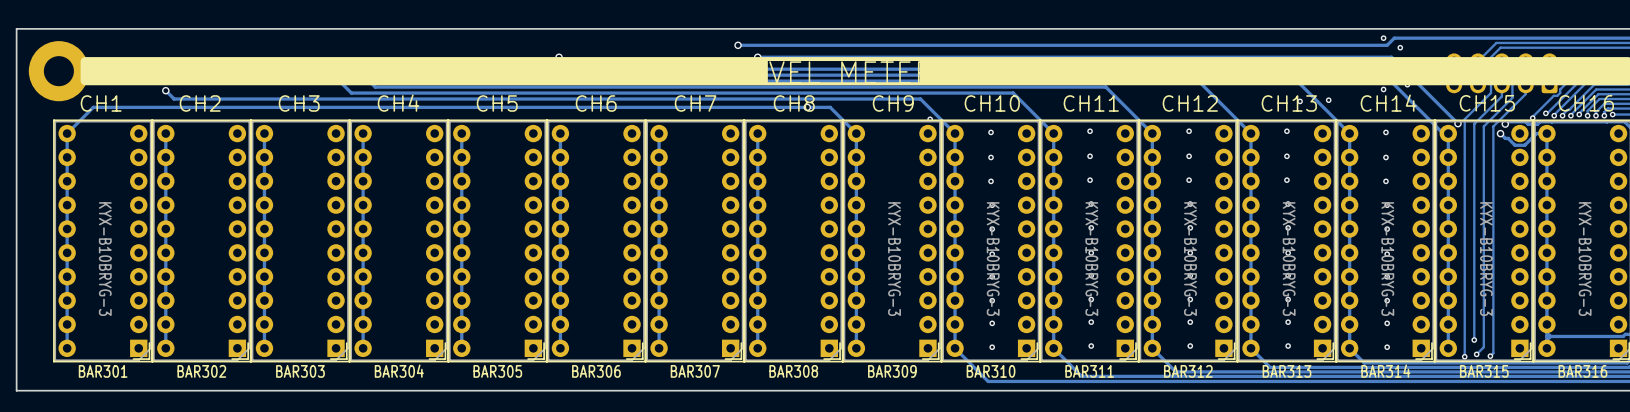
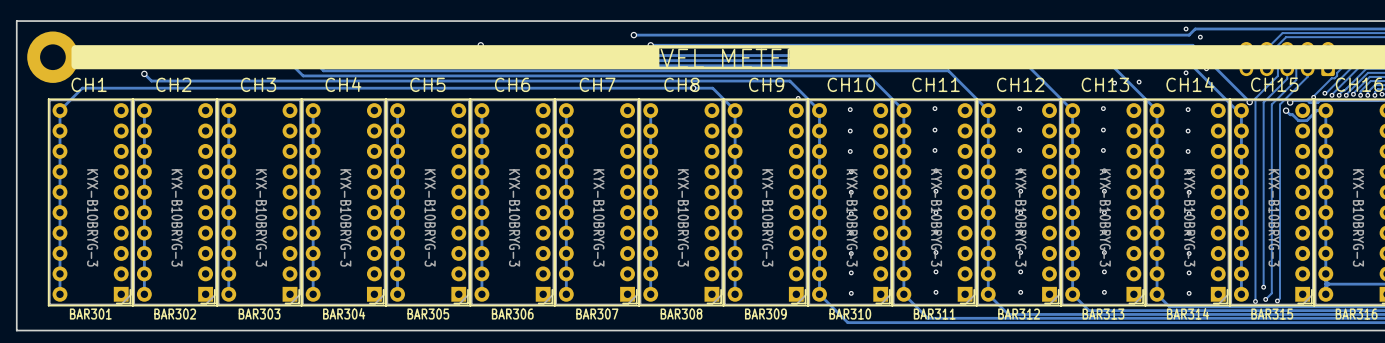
BAR302 value: none -> KYX-B10BRYG-3 (177, 217)
BAR303 value: none -> KYX-B10BRYG-3 (261, 217)
BAR304 value: none -> KYX-B10BRYG-3 (345, 217)
BAR305 value: none -> KYX-B10BRYG-3 (430, 217)
BAR306 value: none -> KYX-B10BRYG-3 (514, 217)
BAR307 value: none -> KYX-B10BRYG-3 (598, 217)
BAR308 value: none -> KYX-B10BRYG-3 (683, 217)

